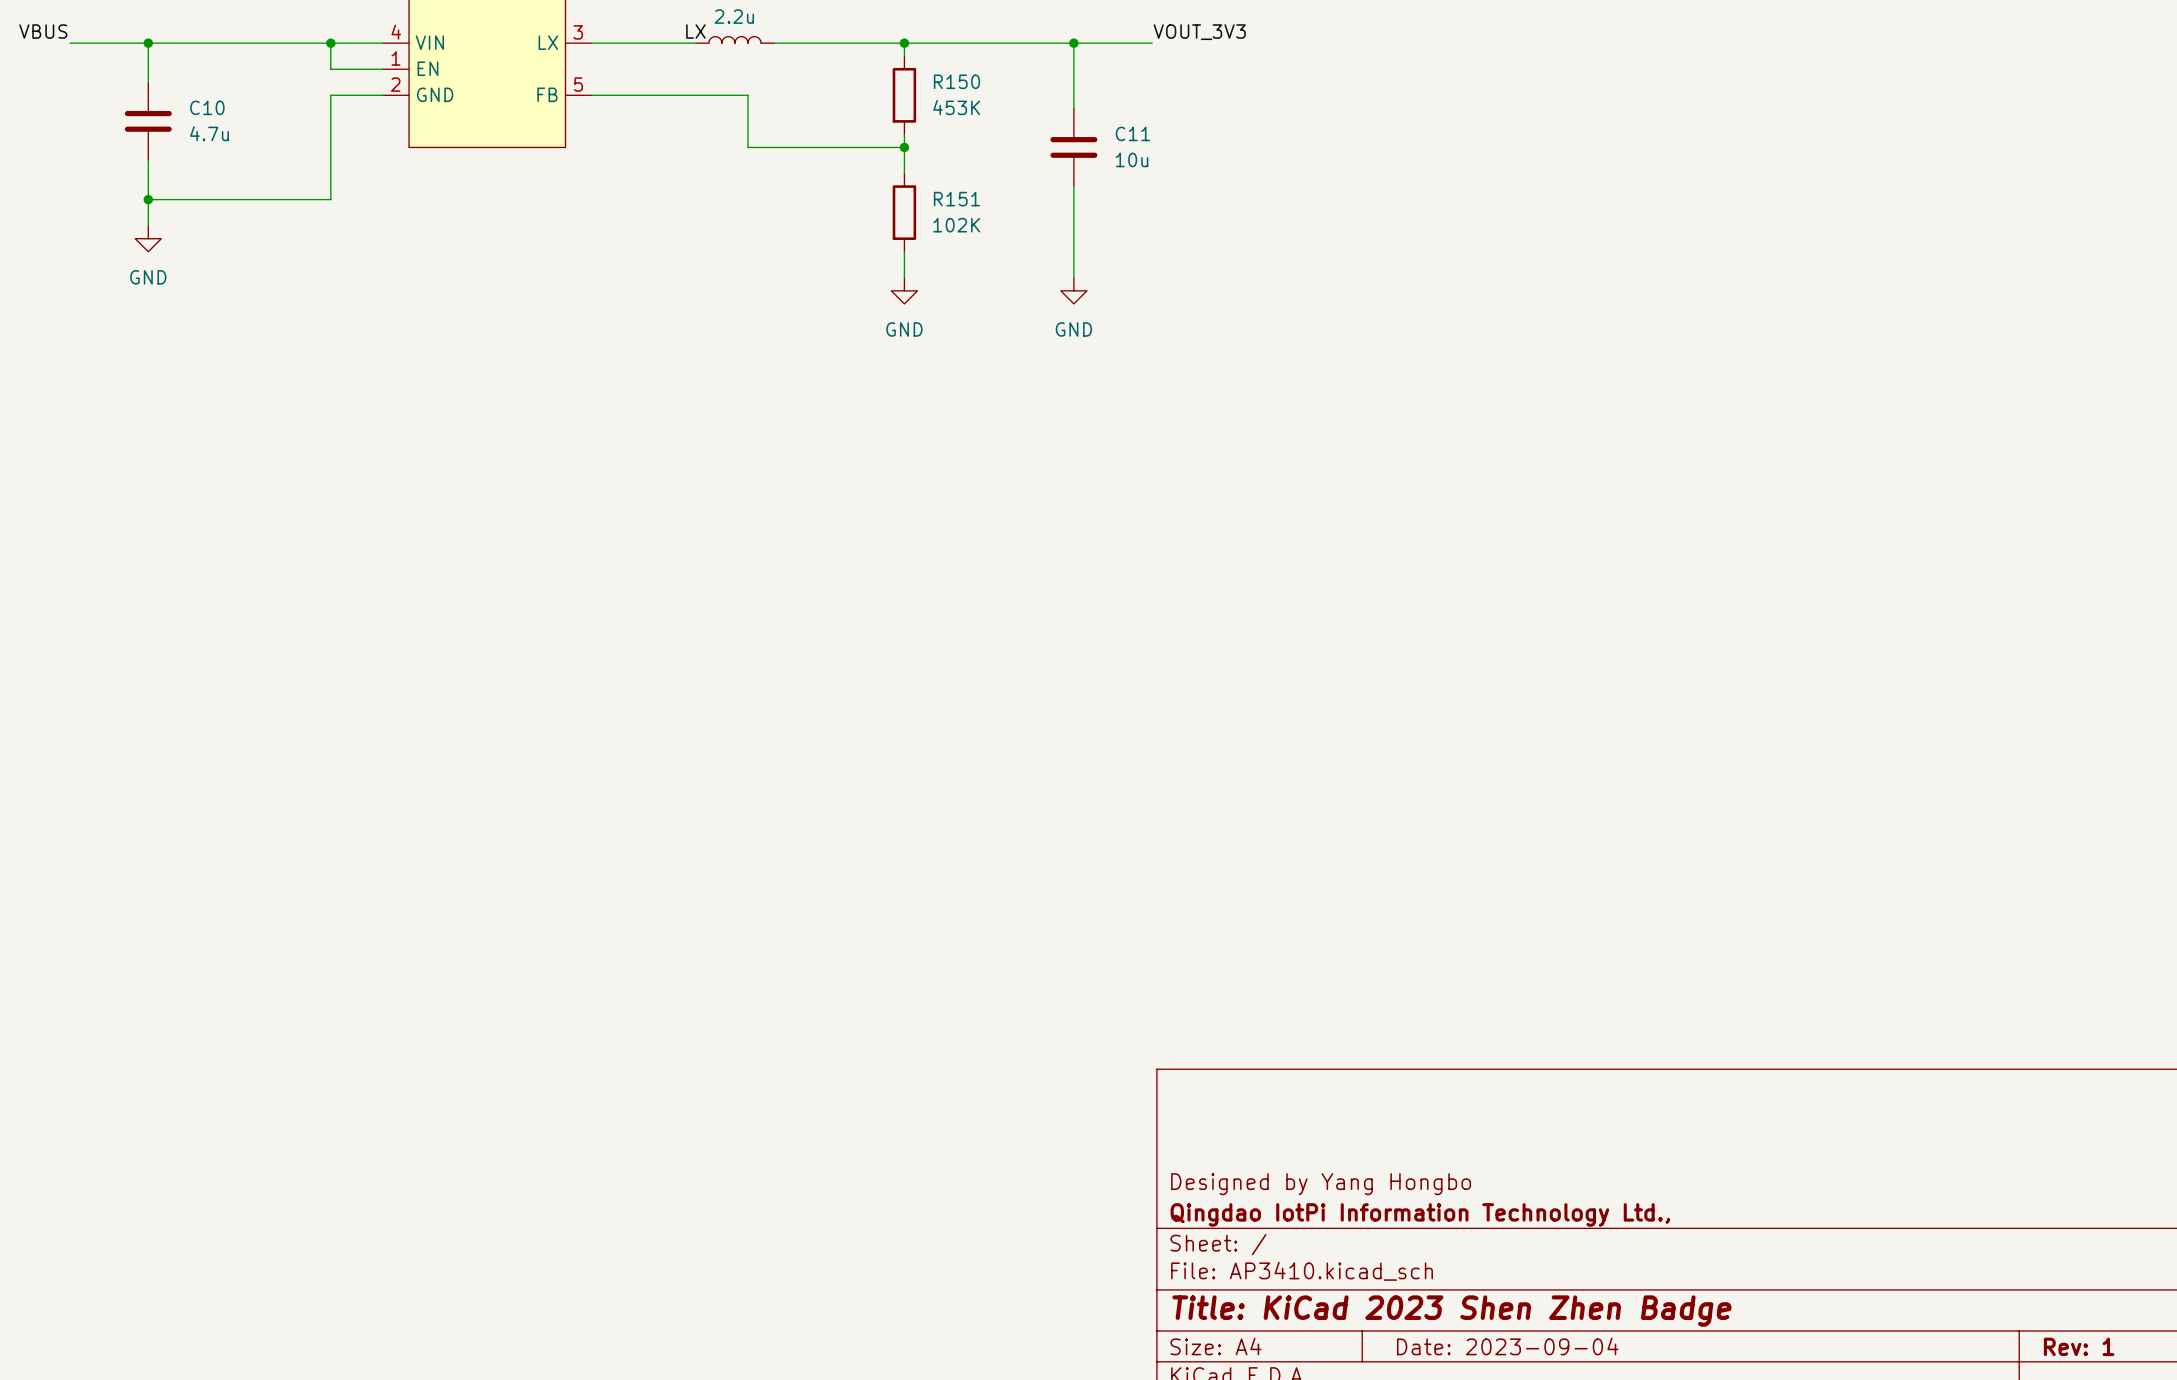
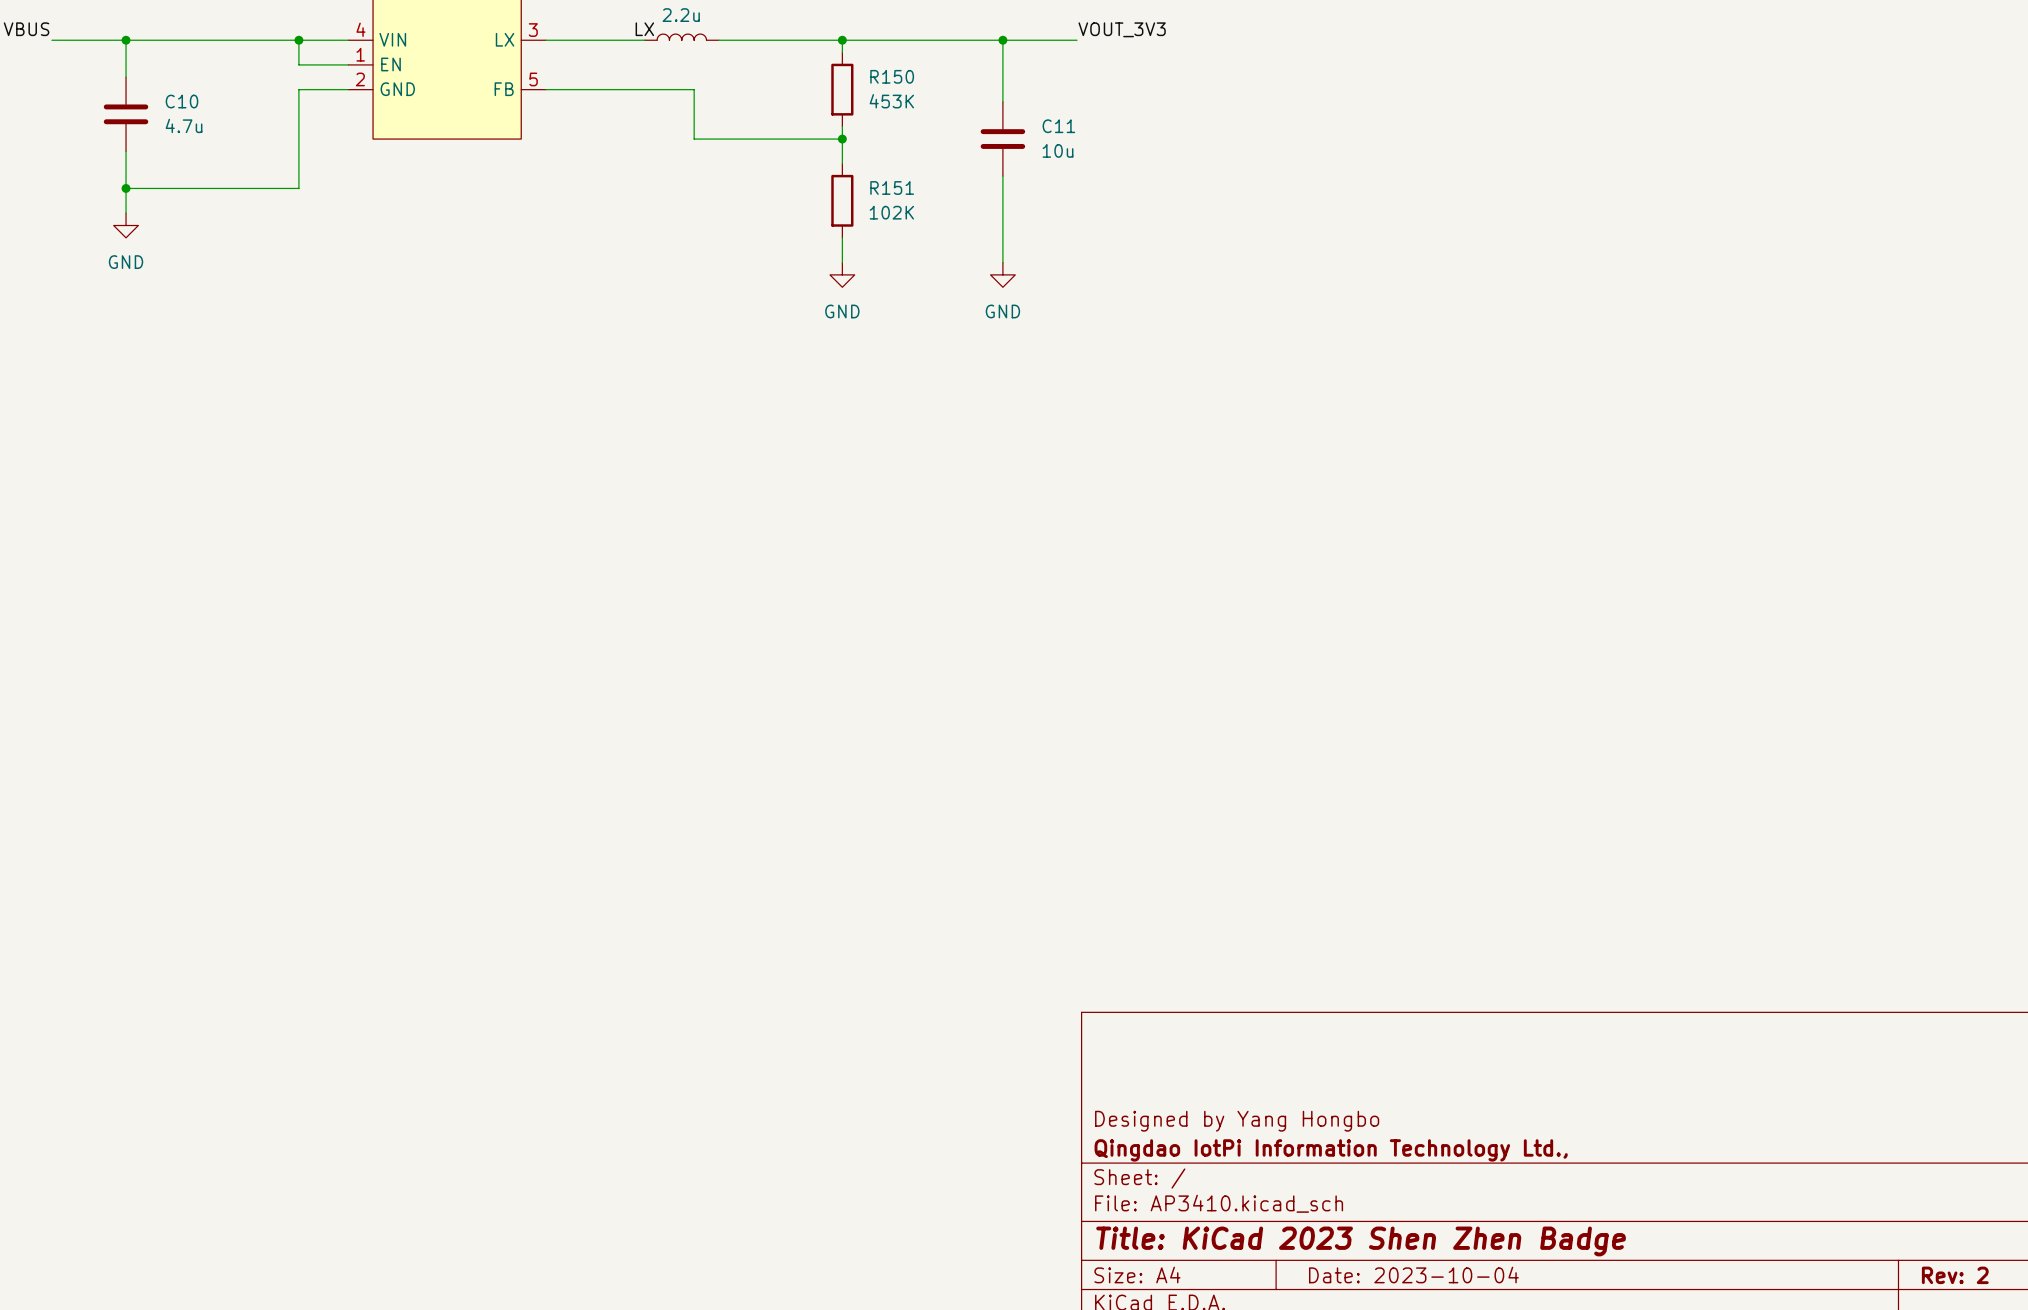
title block: Date: 2023-09-04 (1507, 1346) -> Date: 2023-10-04 (1413, 1275)
title block: Rev: 1 (2079, 1346) -> Rev: 2 (1955, 1275)

